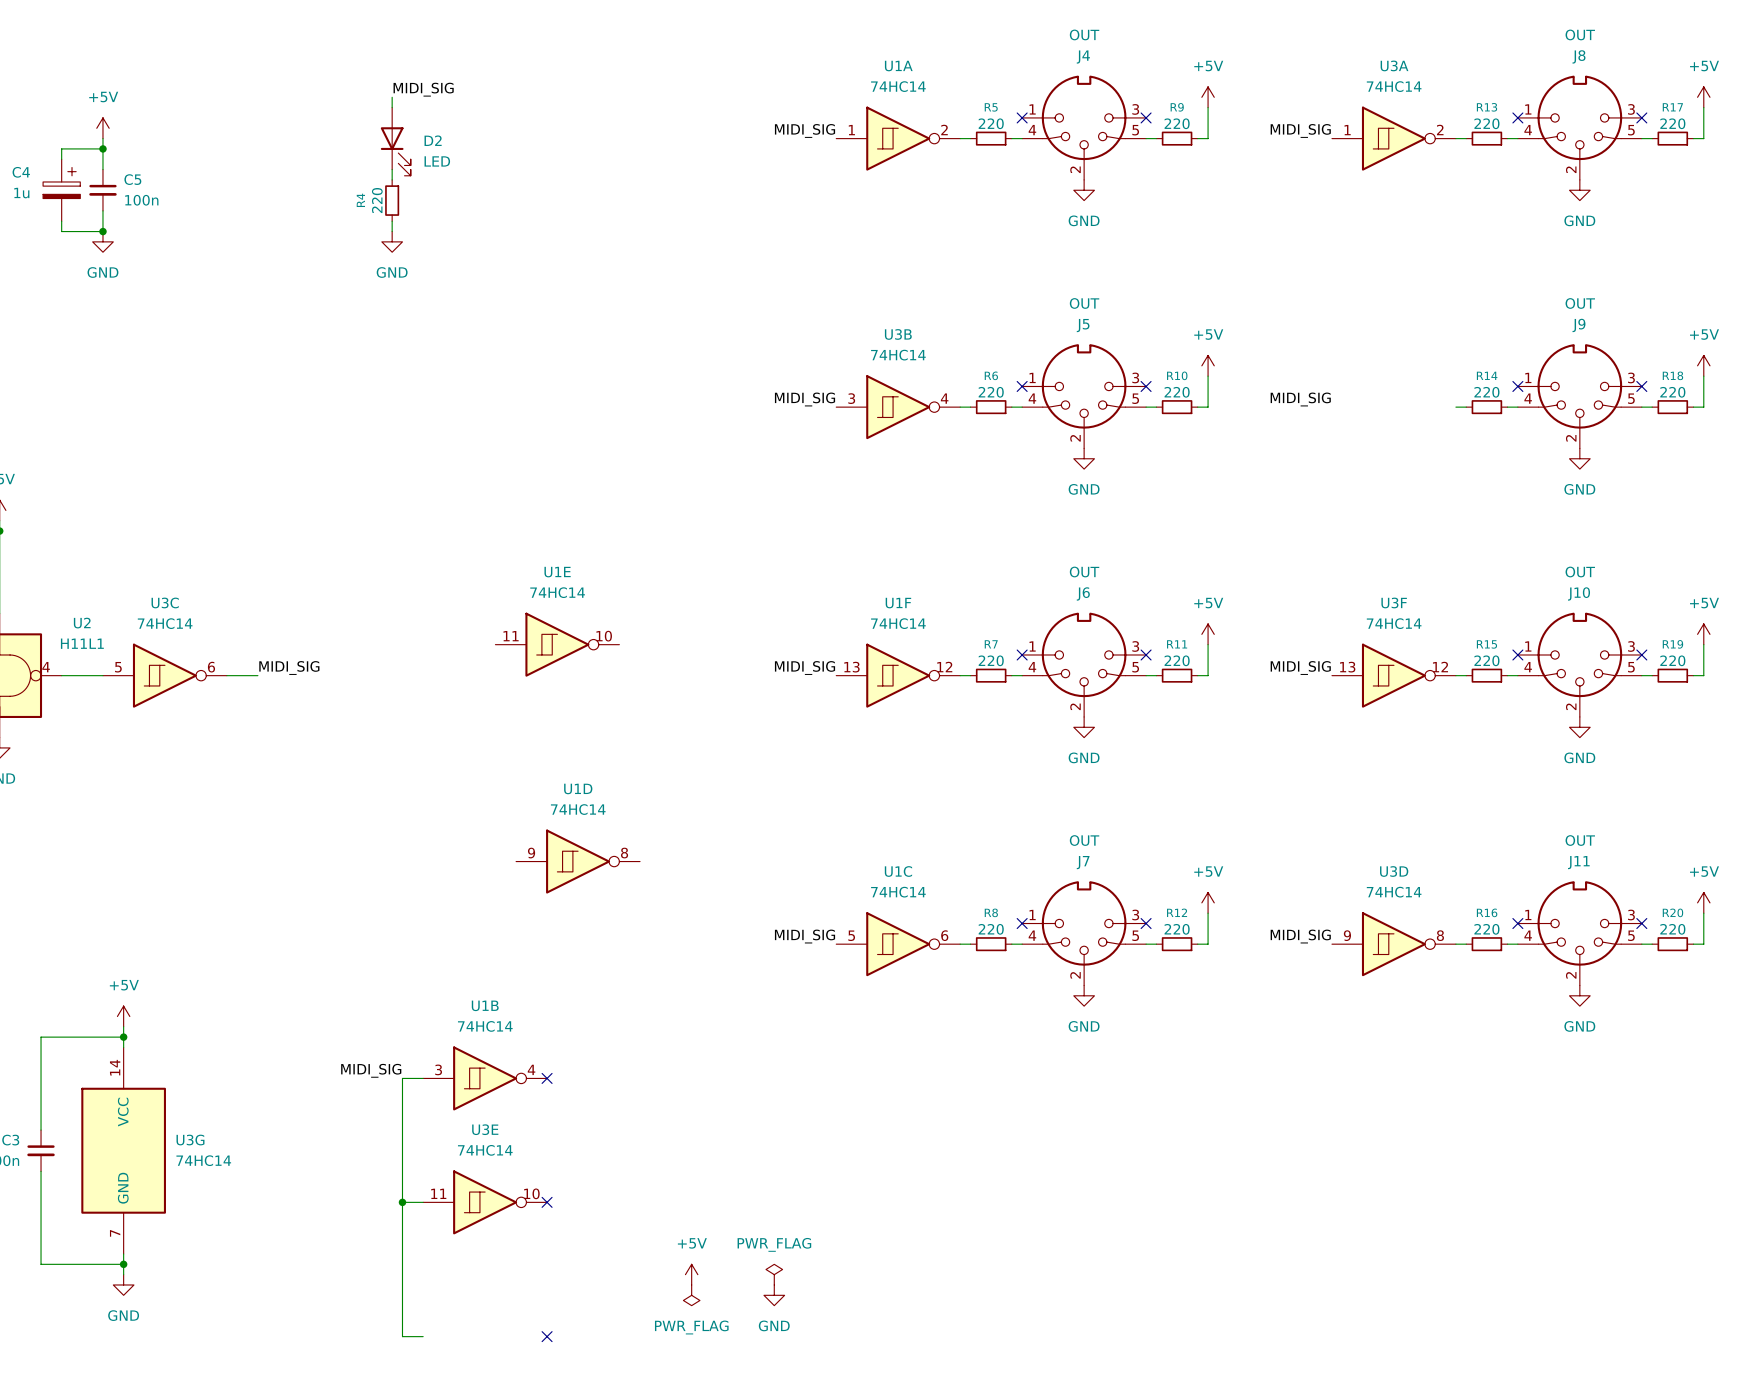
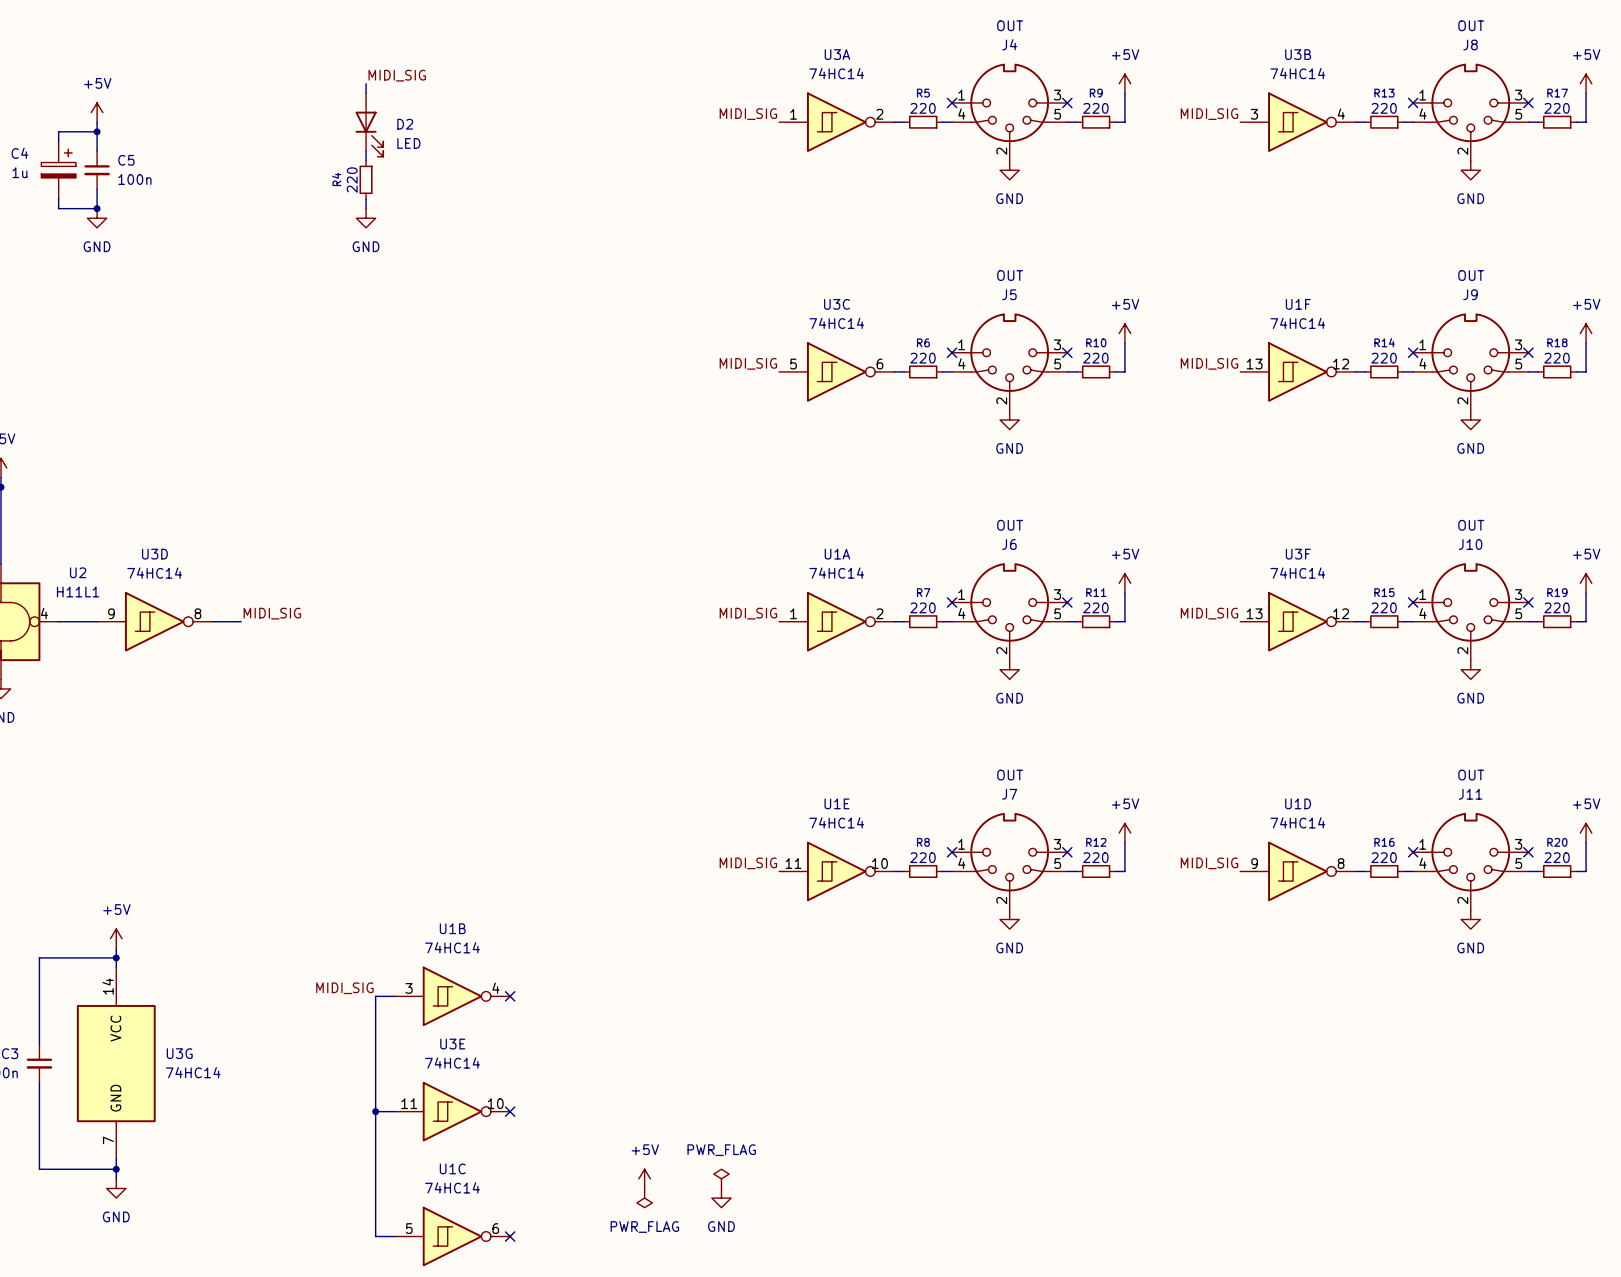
U1A name: U1A (898, 66) -> U3A (837, 54)
U3A: 74HC14 (1393, 138) -> none
U3B position: (898, 407) -> (1297, 122)
U1E position: (557, 644) -> (836, 871)
U3C position: (164, 675) -> (836, 371)
U3D: none -> 74HC14 (154, 621)
U1F position: (898, 675) -> (1297, 371)
U1A: none -> 74HC14 (836, 621)
U1D: 74HC14 (578, 861) -> none
U3D name: U3D (1394, 871) -> U1D (1298, 803)
U1C position: (898, 944) -> (452, 1236)

